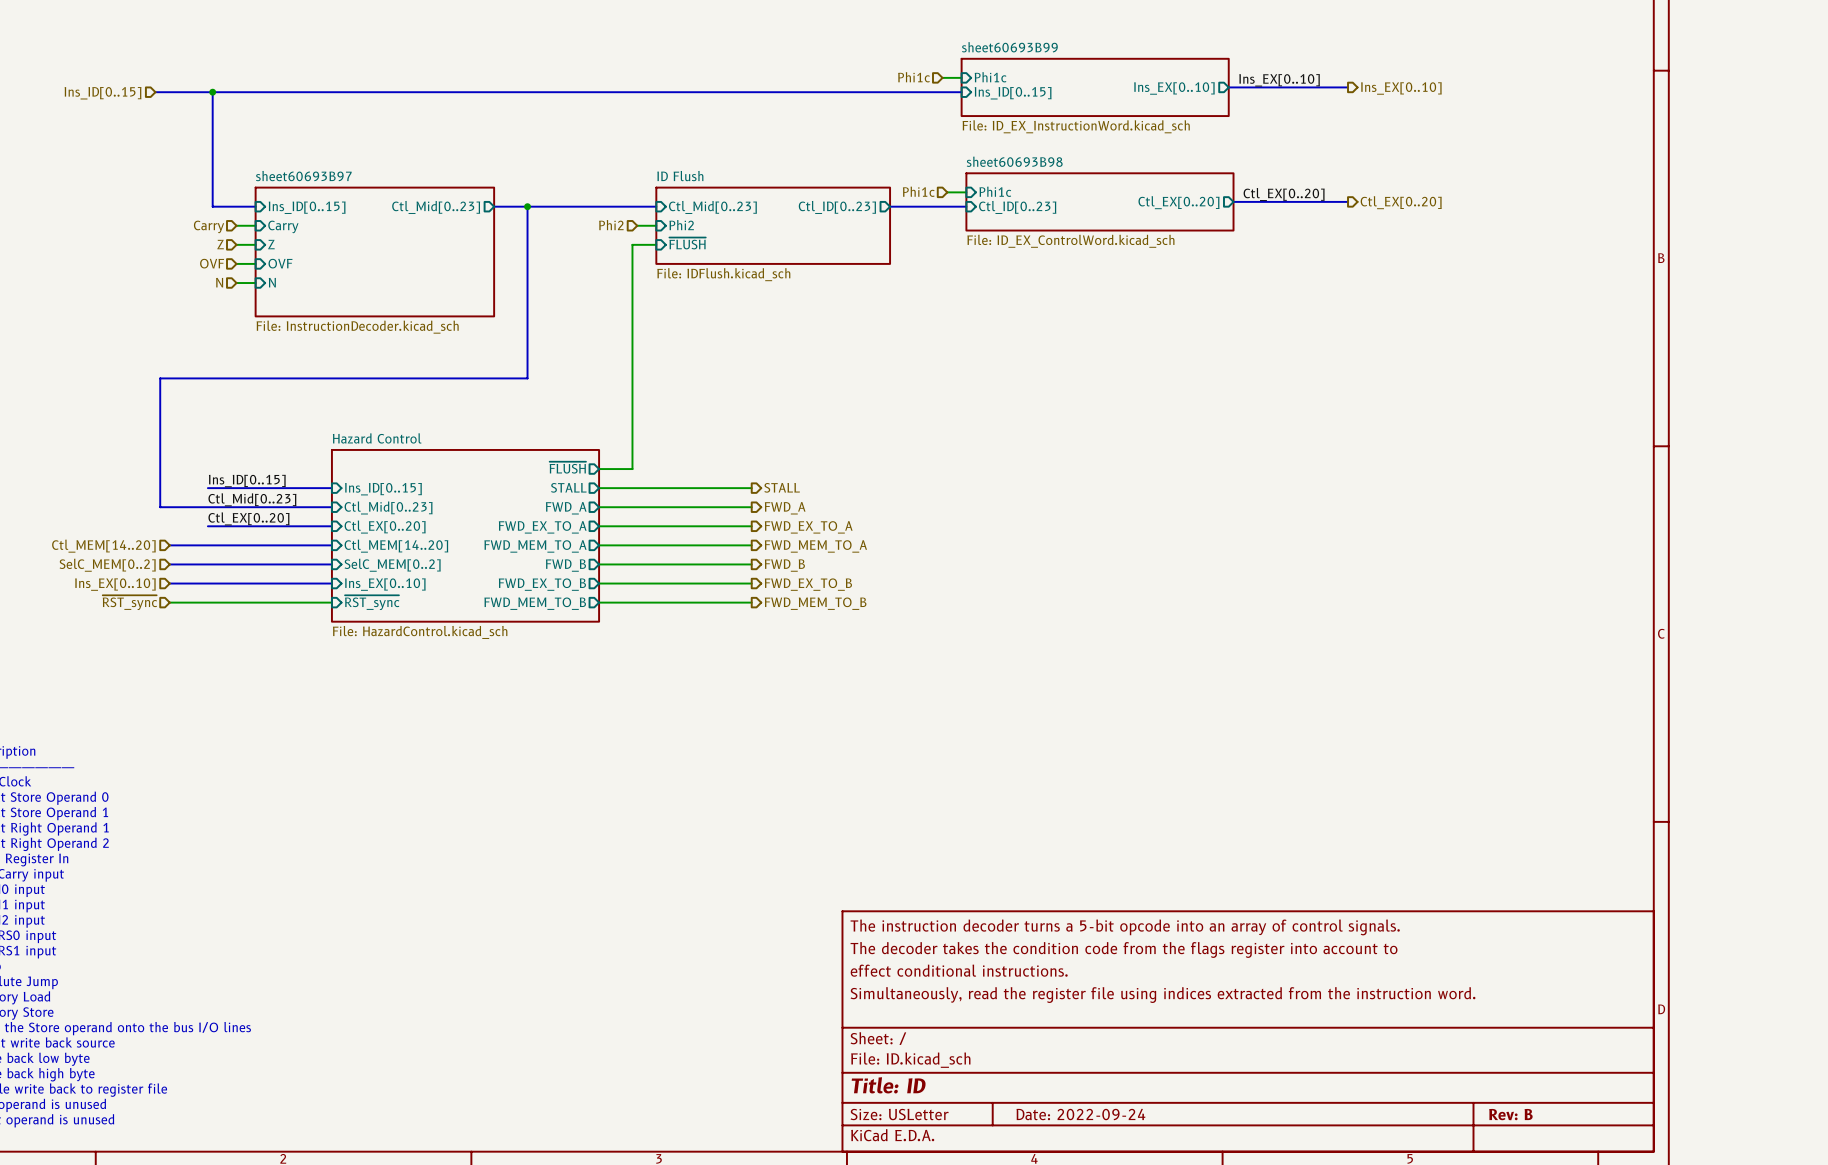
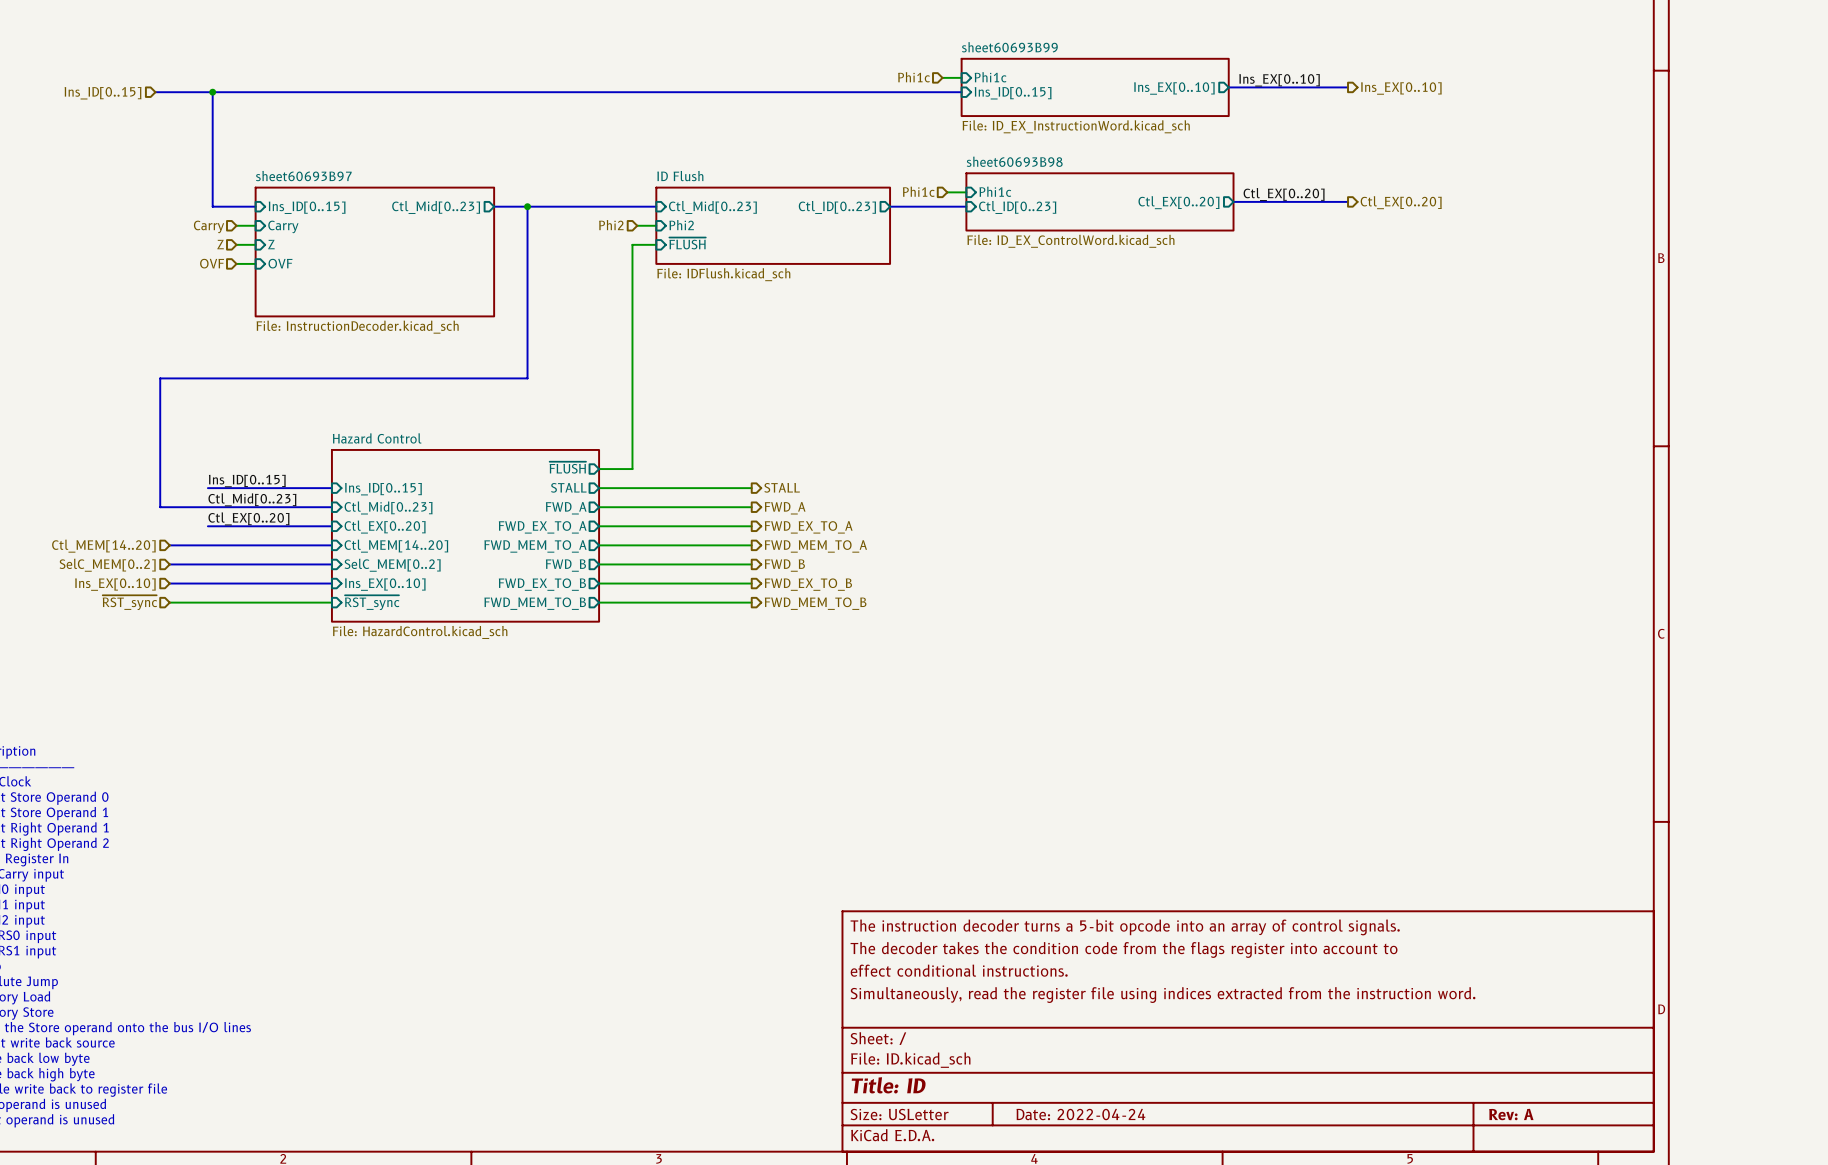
hierarchical label: N (219, 282) -> none
sheet pin: N (272, 282) -> none
wire: (236, 283) (255, 283) -> none
title block: Date: 2022-09-24 (1080, 1114) -> Date: 2022-04-24 (1080, 1114)
title block: Rev: B (1510, 1114) -> Rev: A (1511, 1114)

